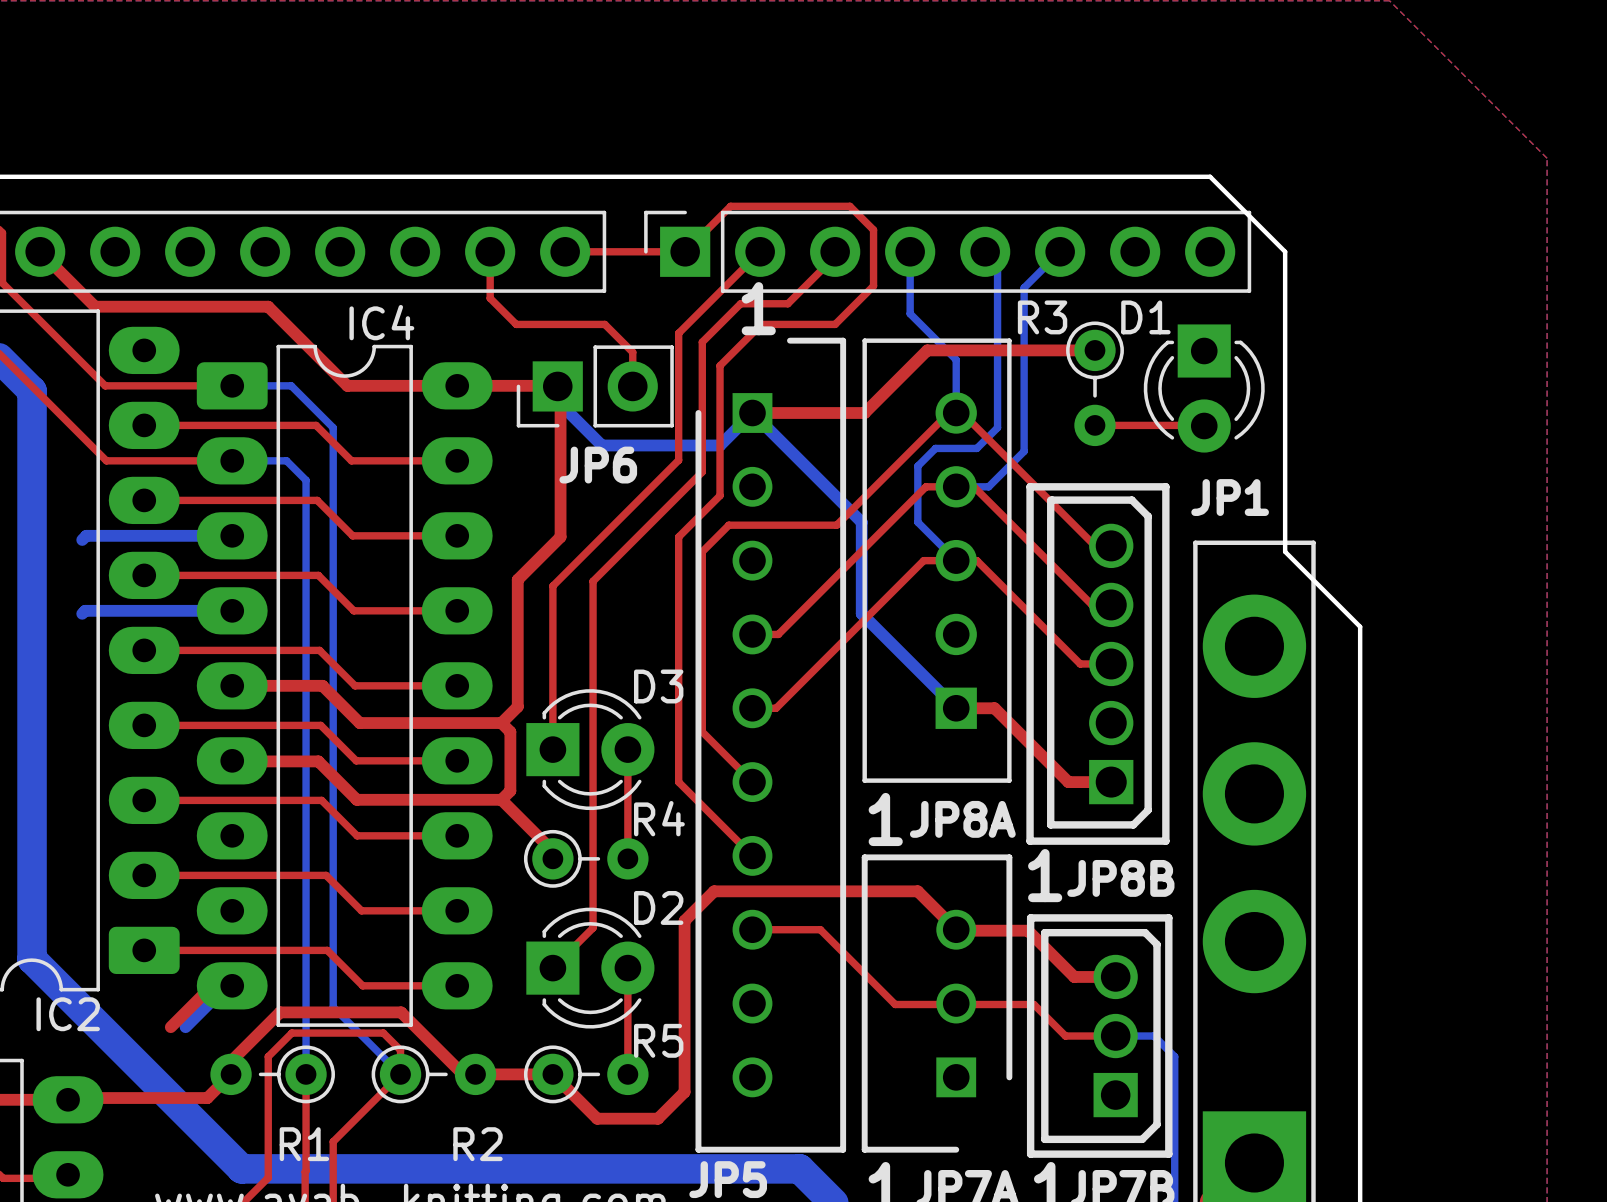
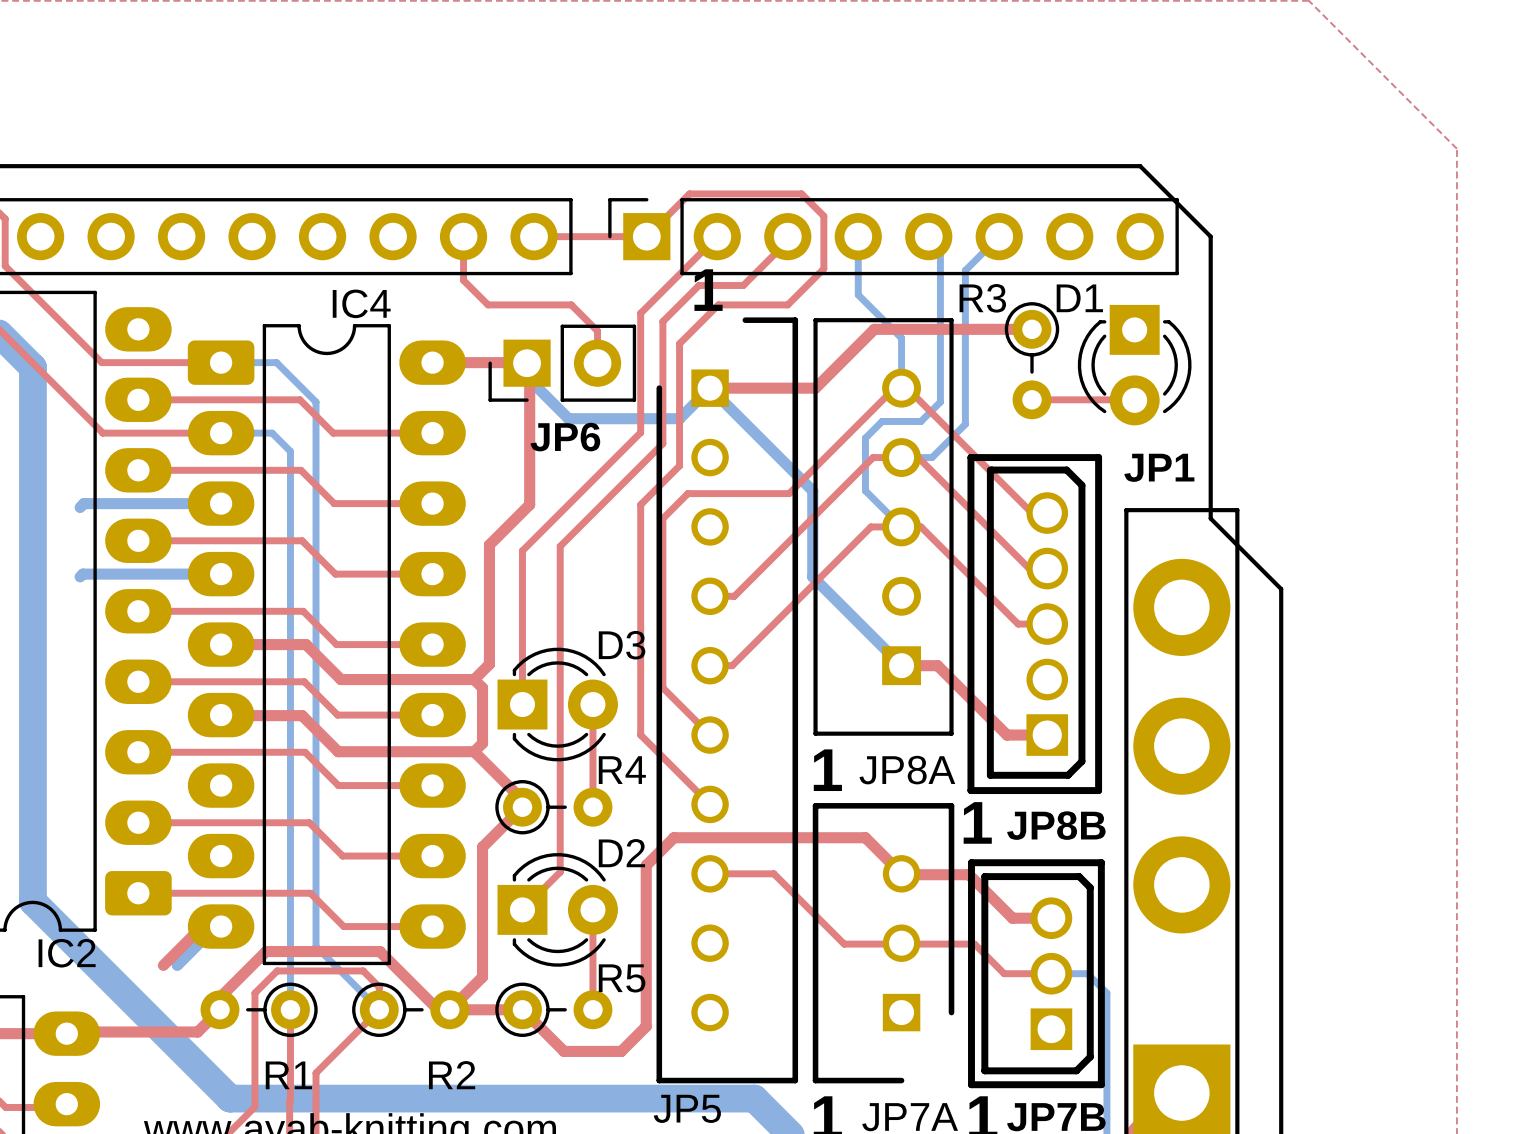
top track: (40, 251) (95, 306) (268, 306) (347, 385) (457, 385) -> none
top track: none -> (522, 807) (482, 847) (482, 977) (449, 1009)

